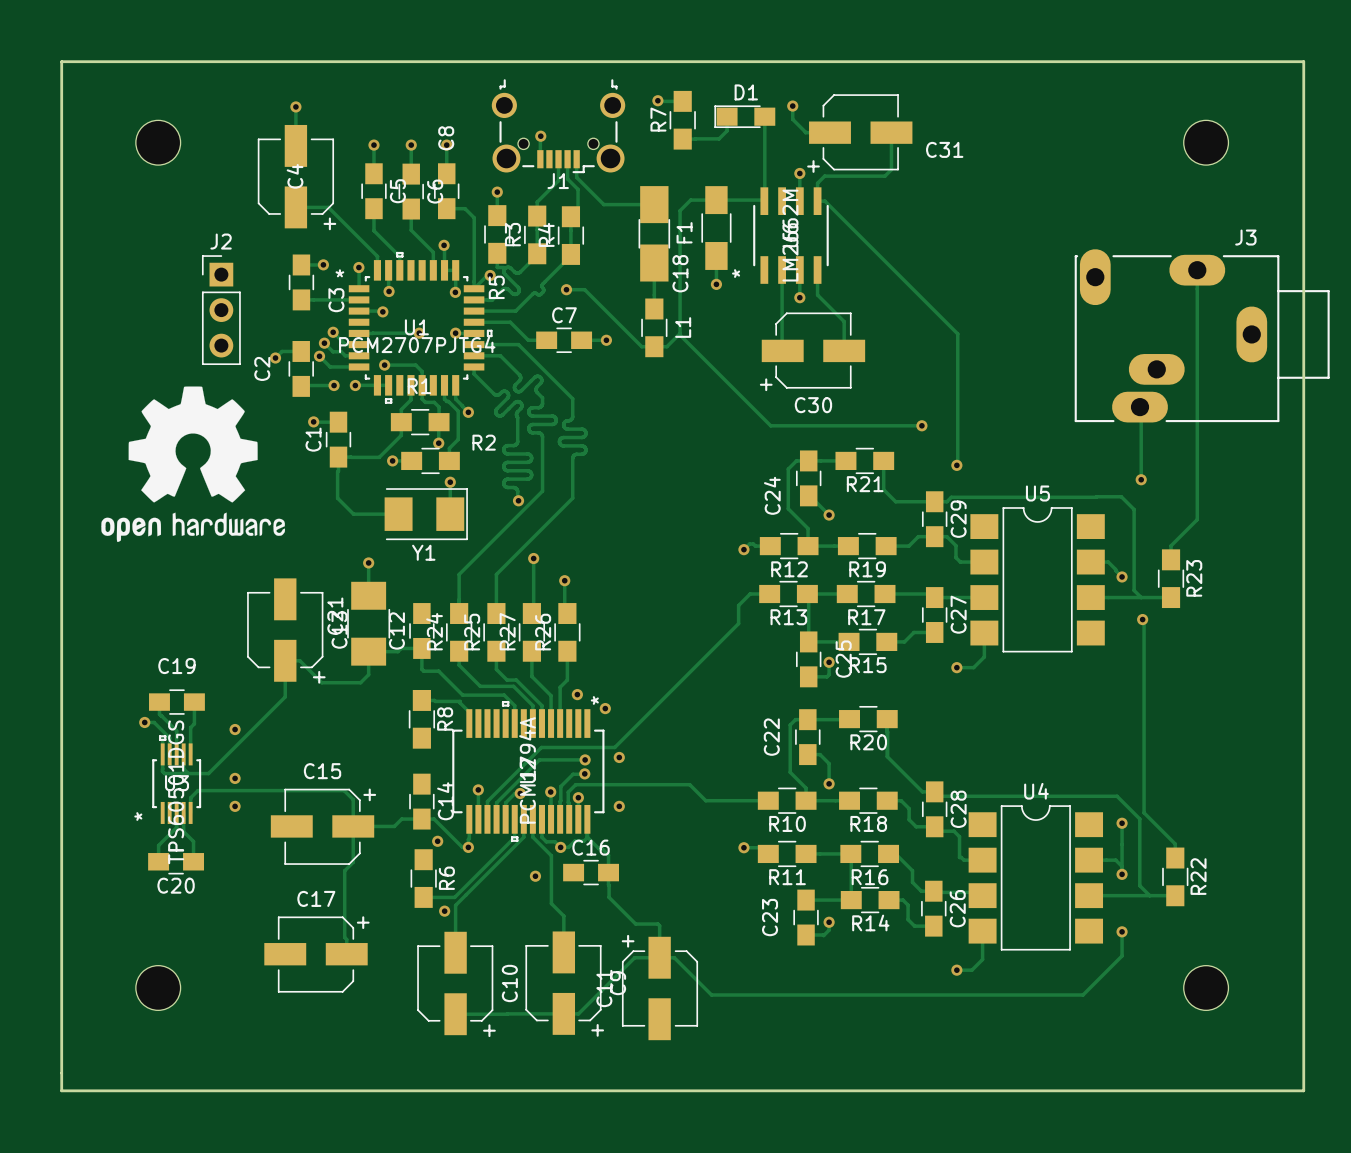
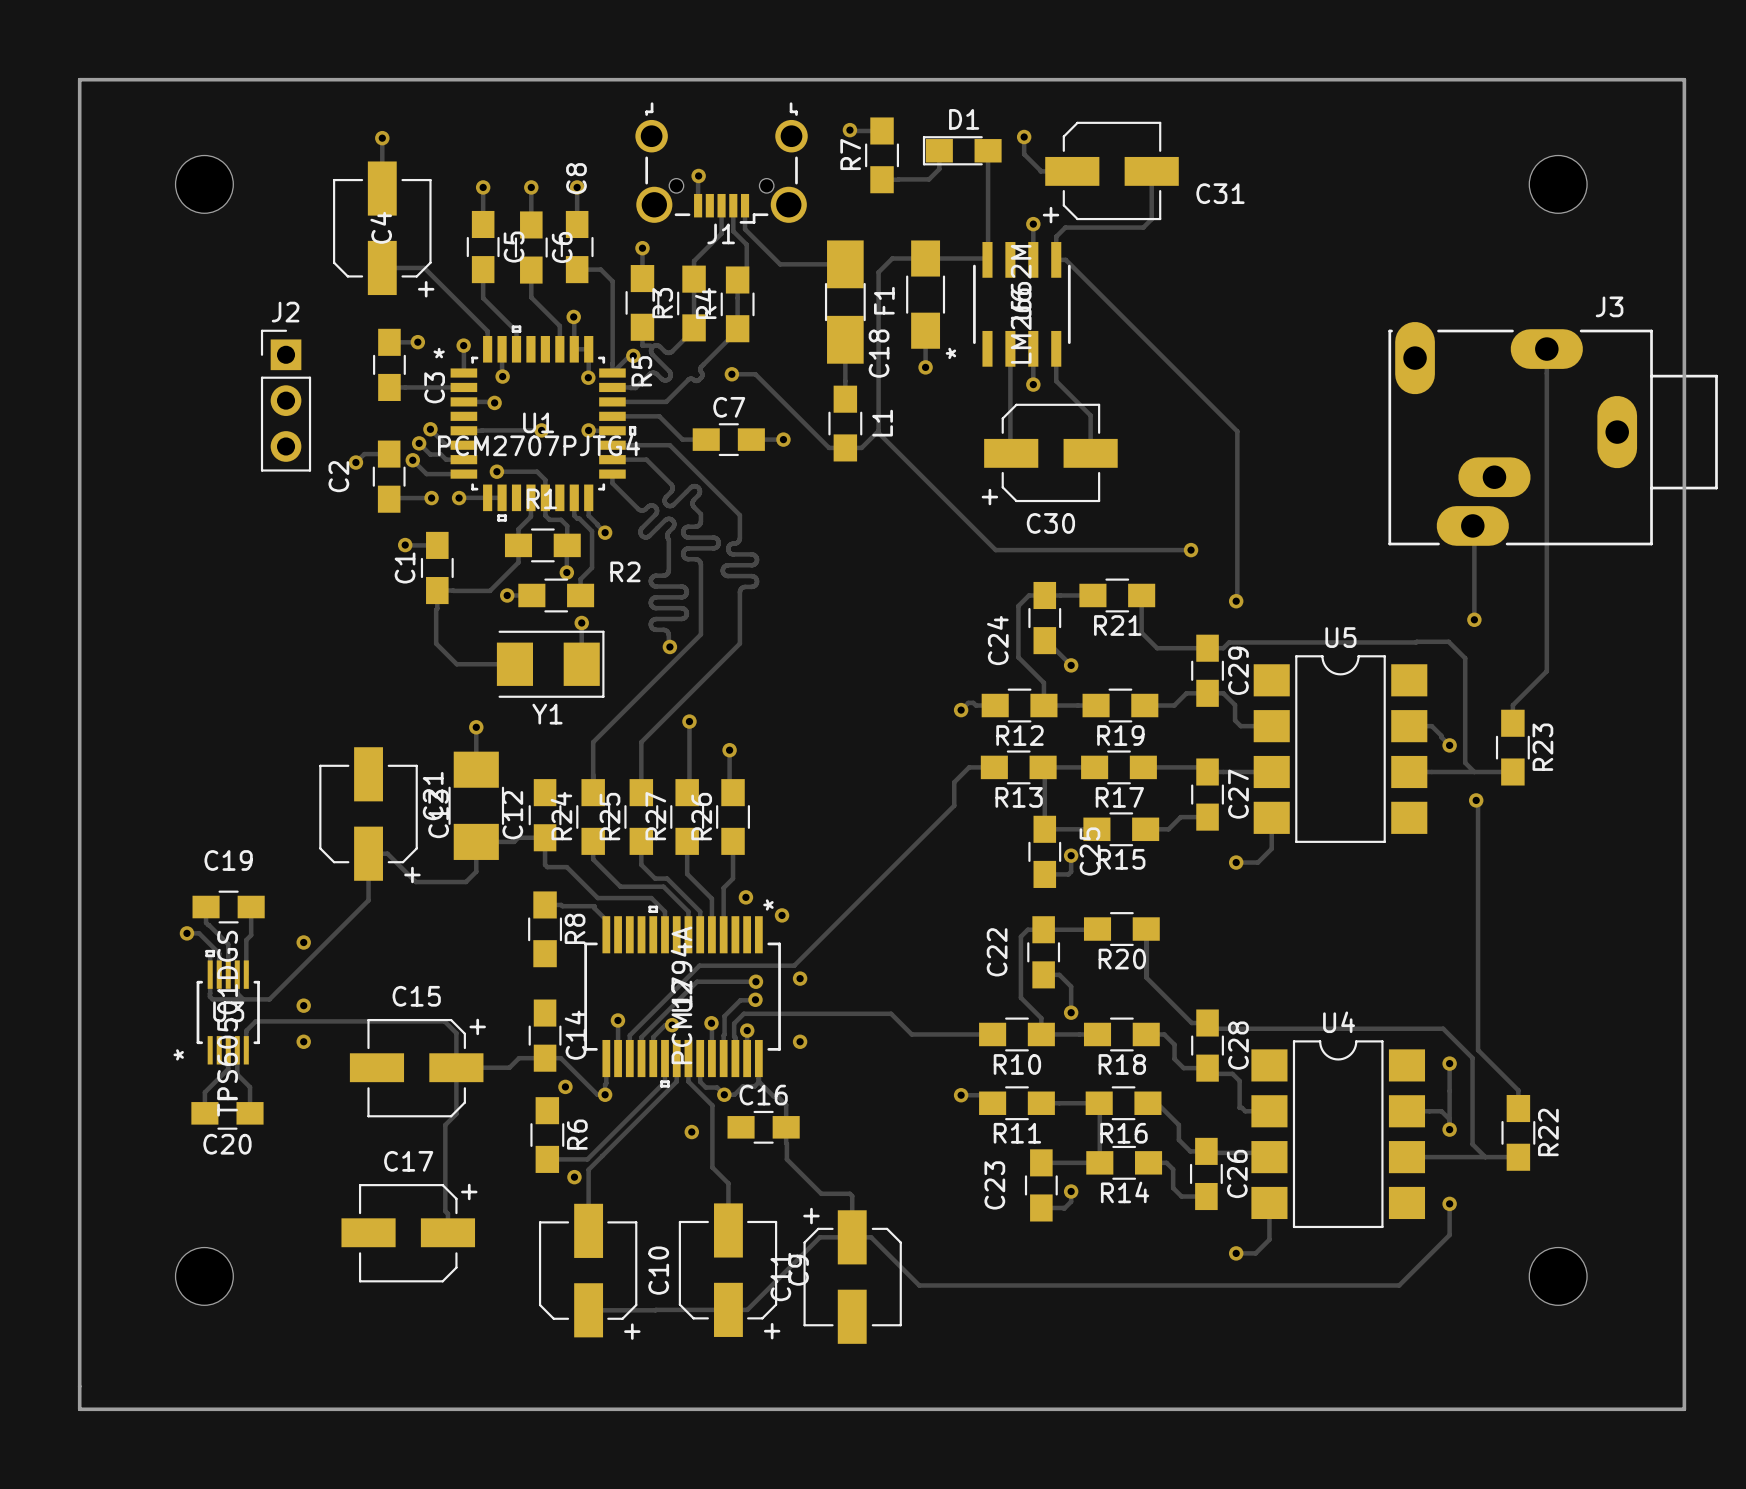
drawing: [101, 386, 286, 543] -> none

